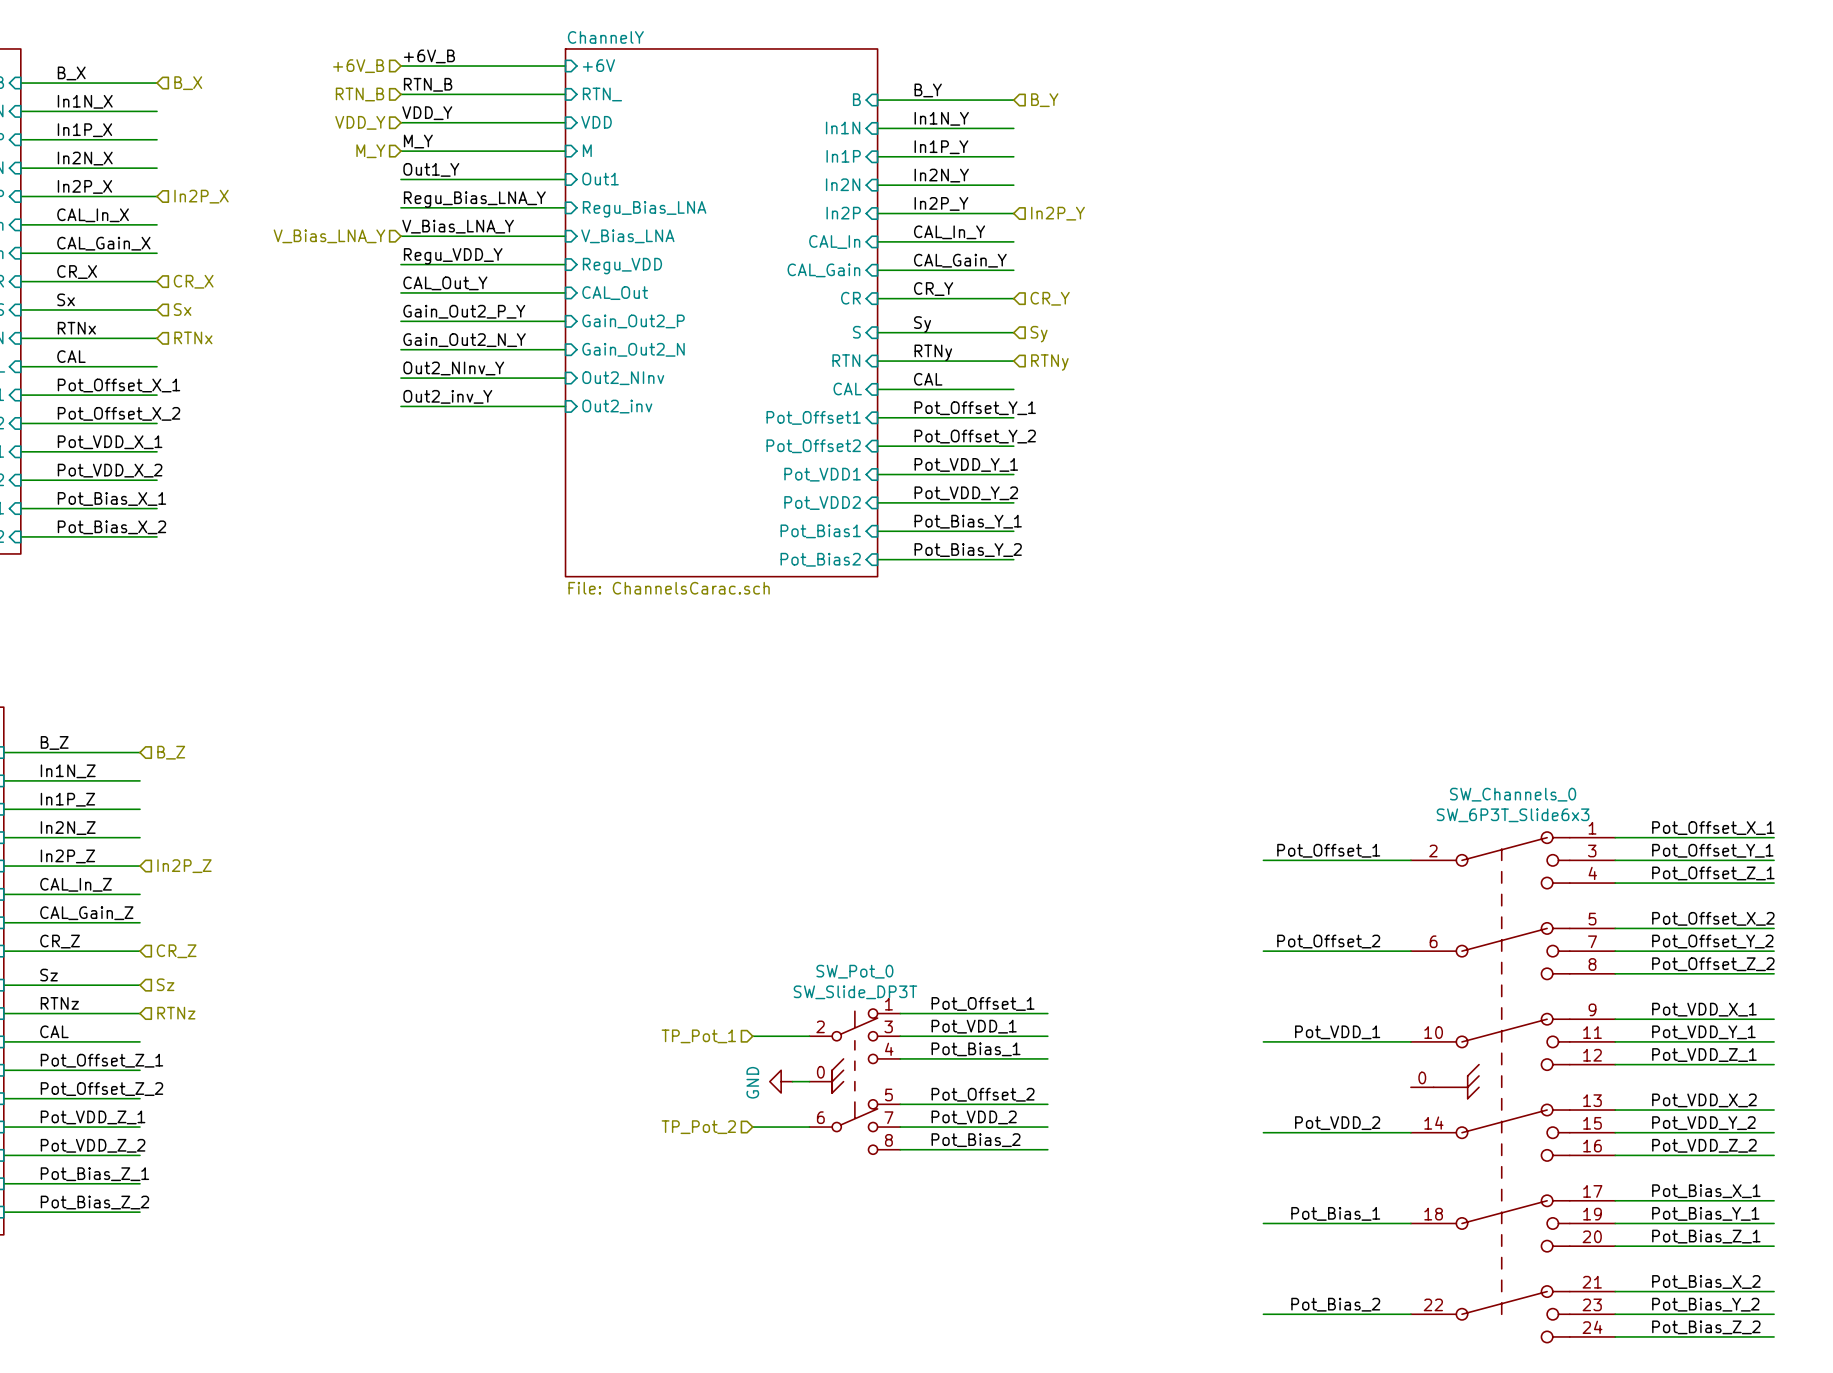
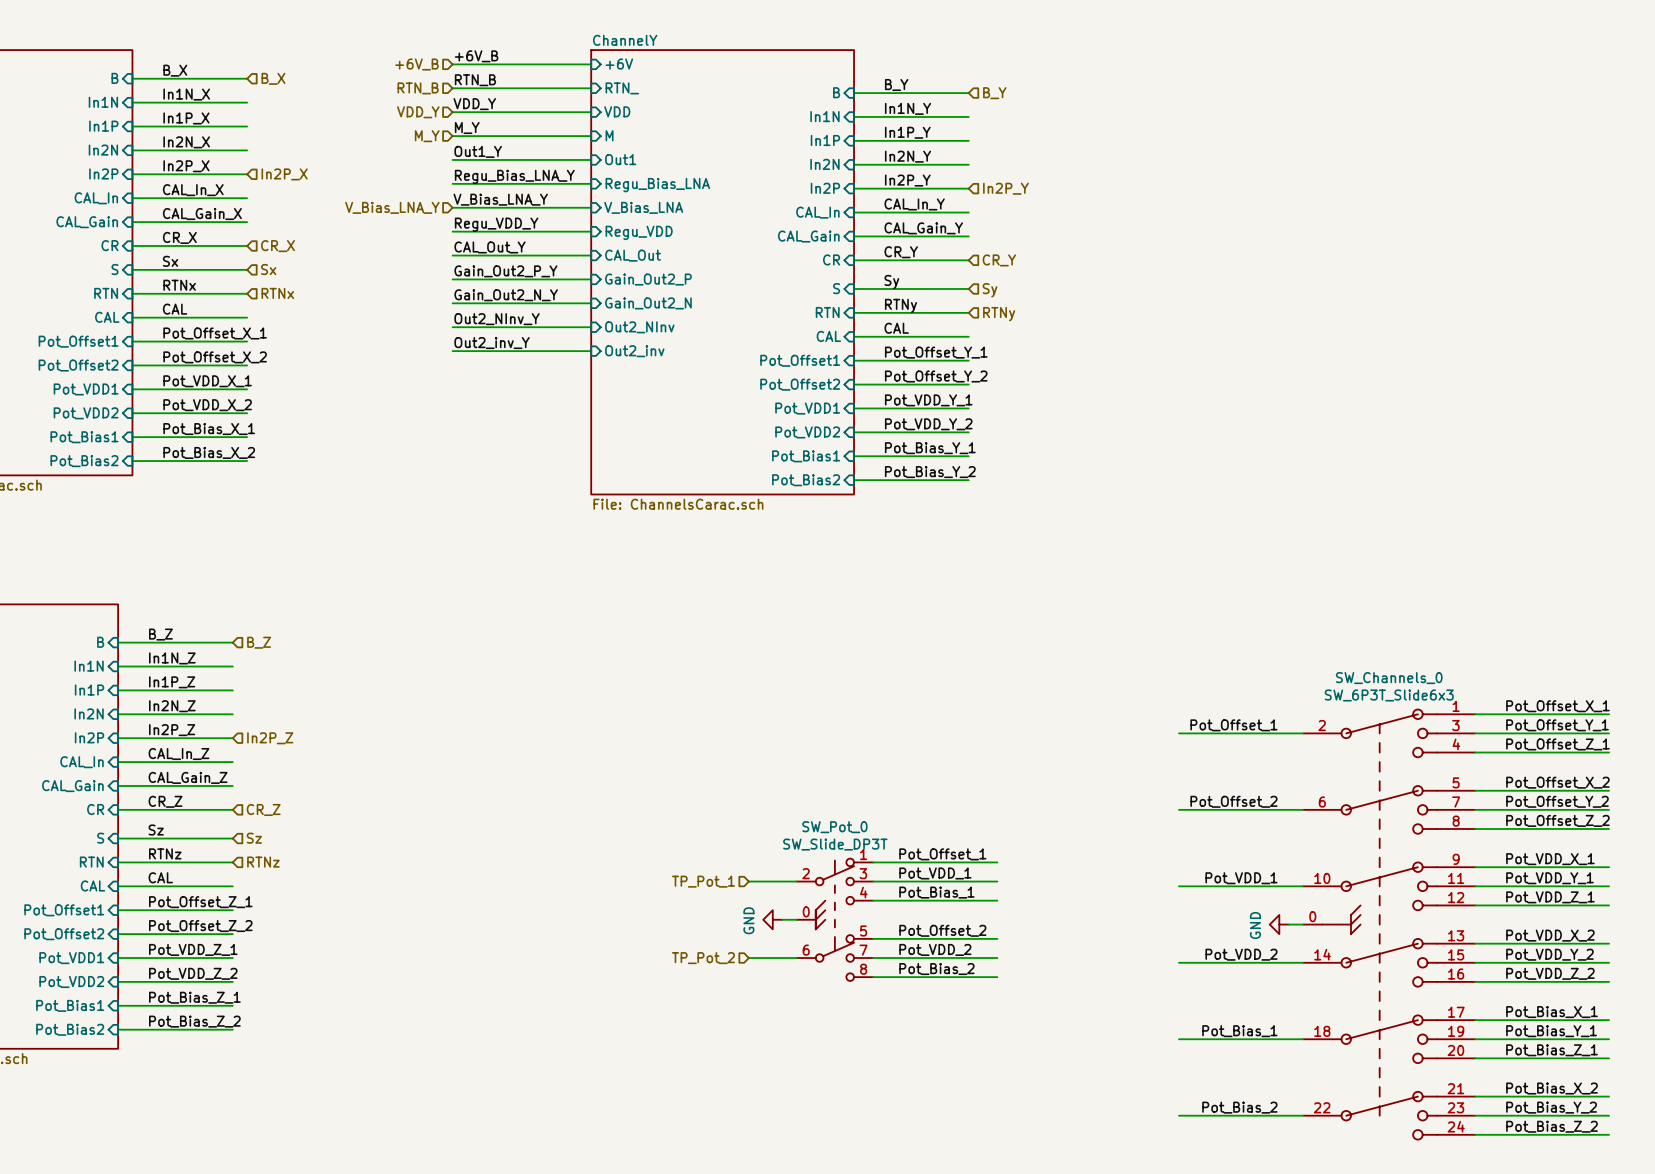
power symbol: none -> GND (1279, 924)
wire: none -> (1288, 924) (1303, 924)

